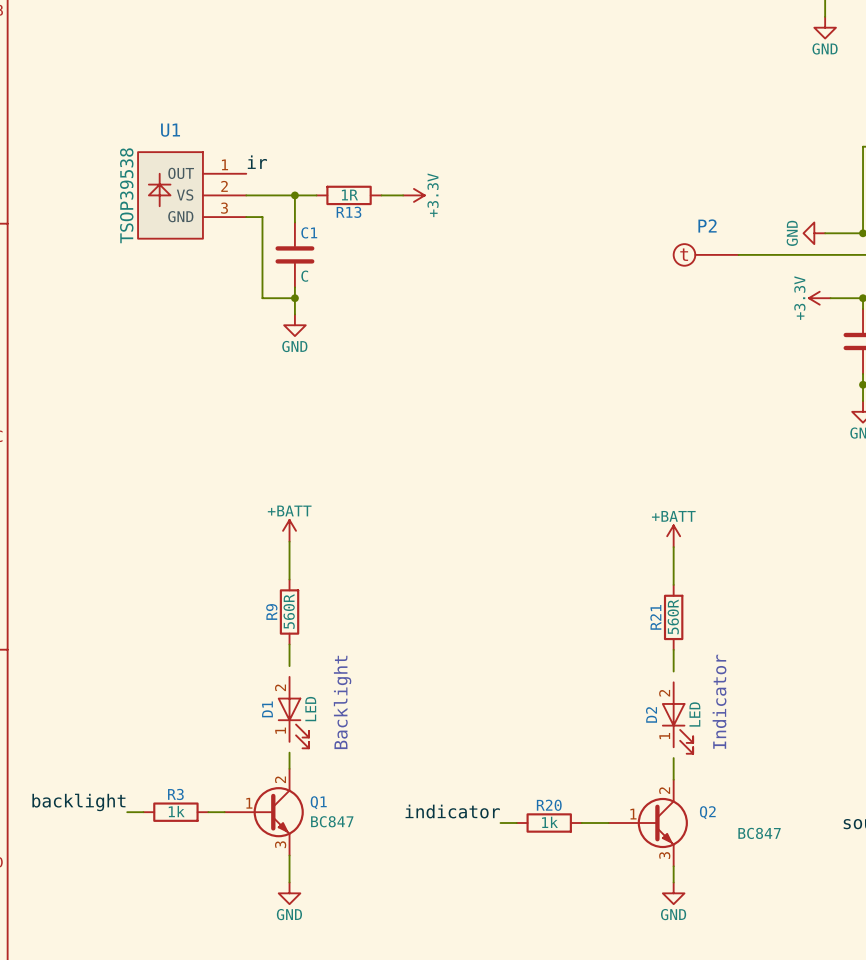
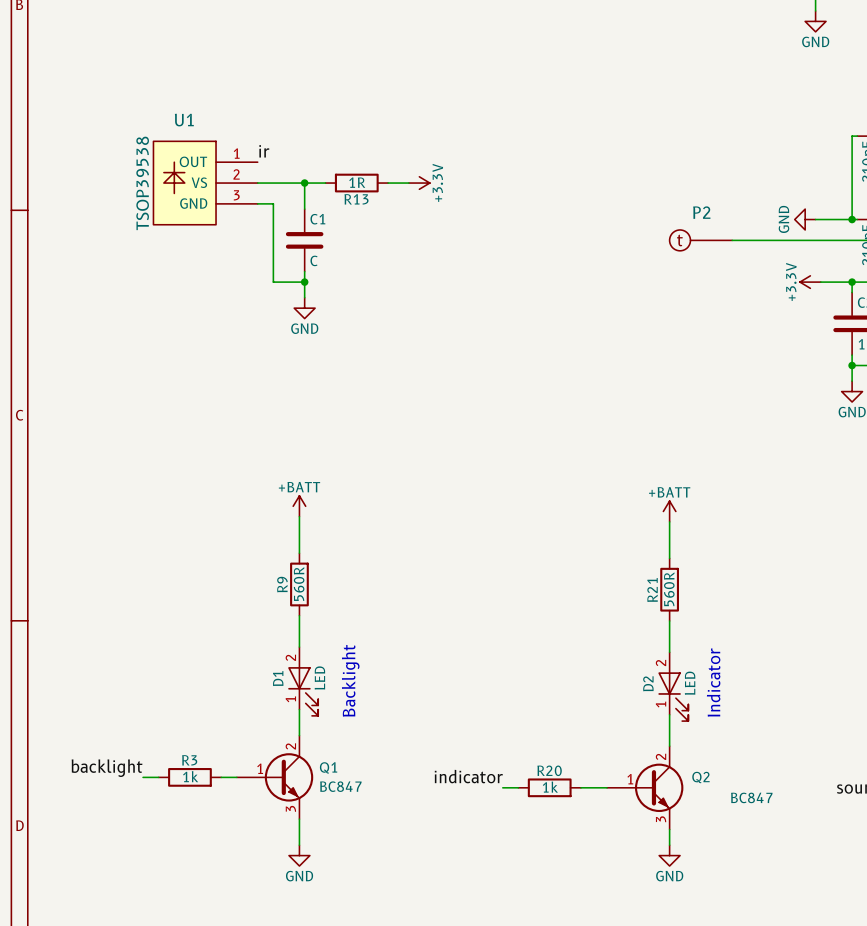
wire: none -> (299, 636) (299, 647)
wire: none -> (669, 641) (669, 652)
wire: none -> (299, 709) (299, 720)
wire: none -> (669, 714) (669, 725)

